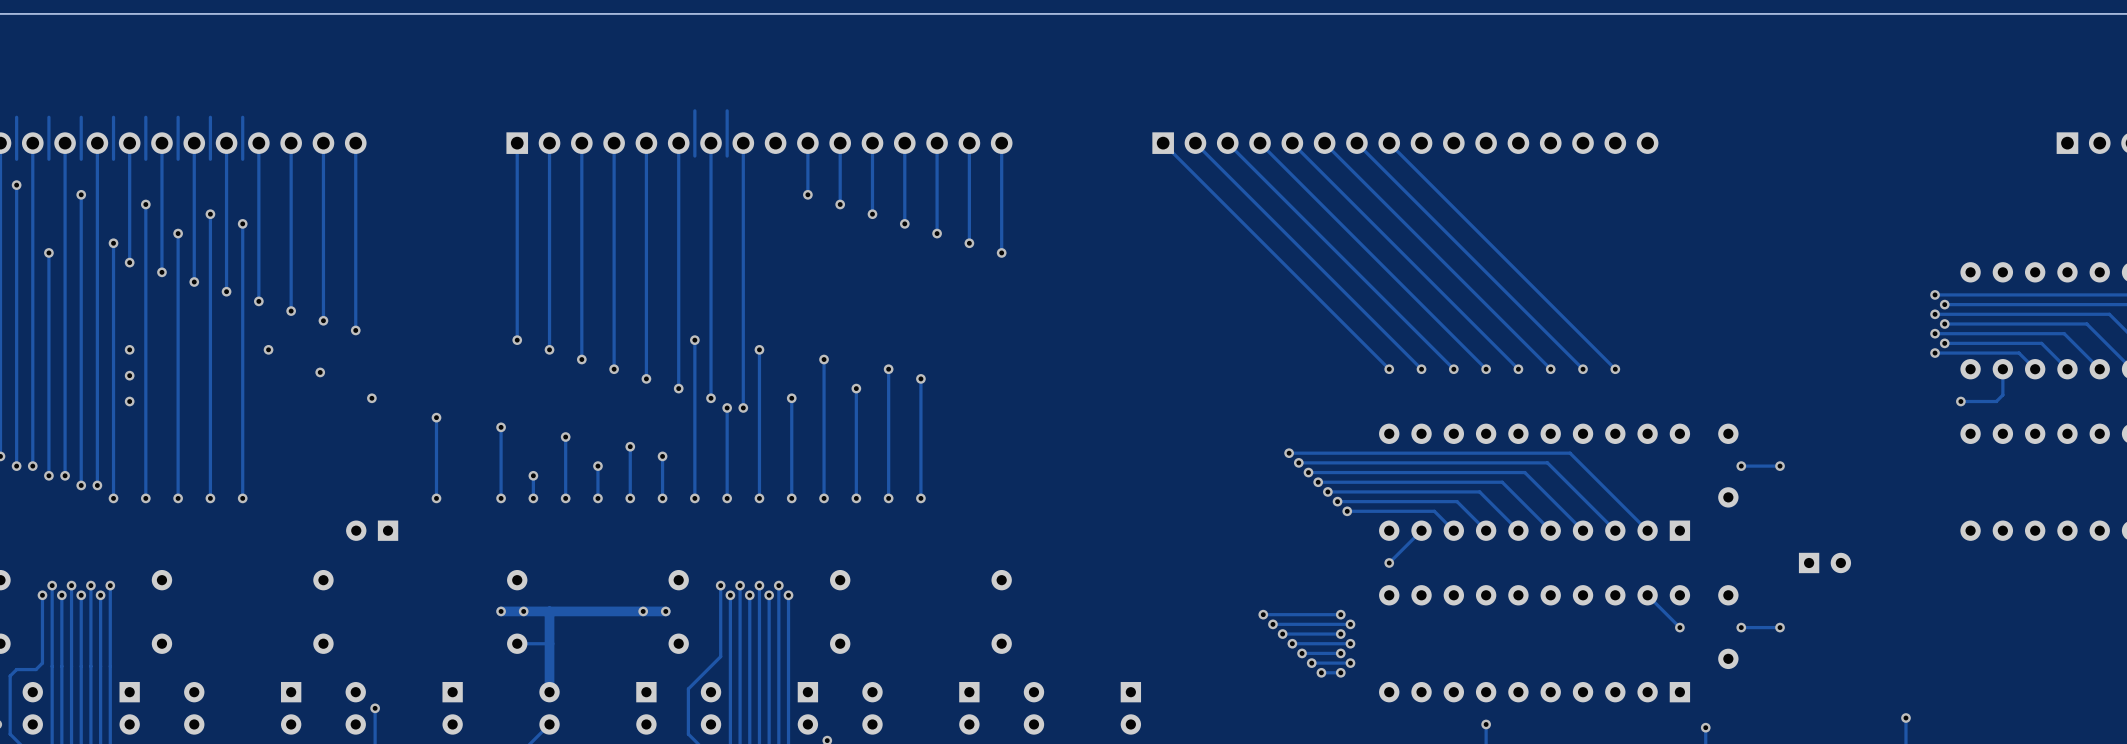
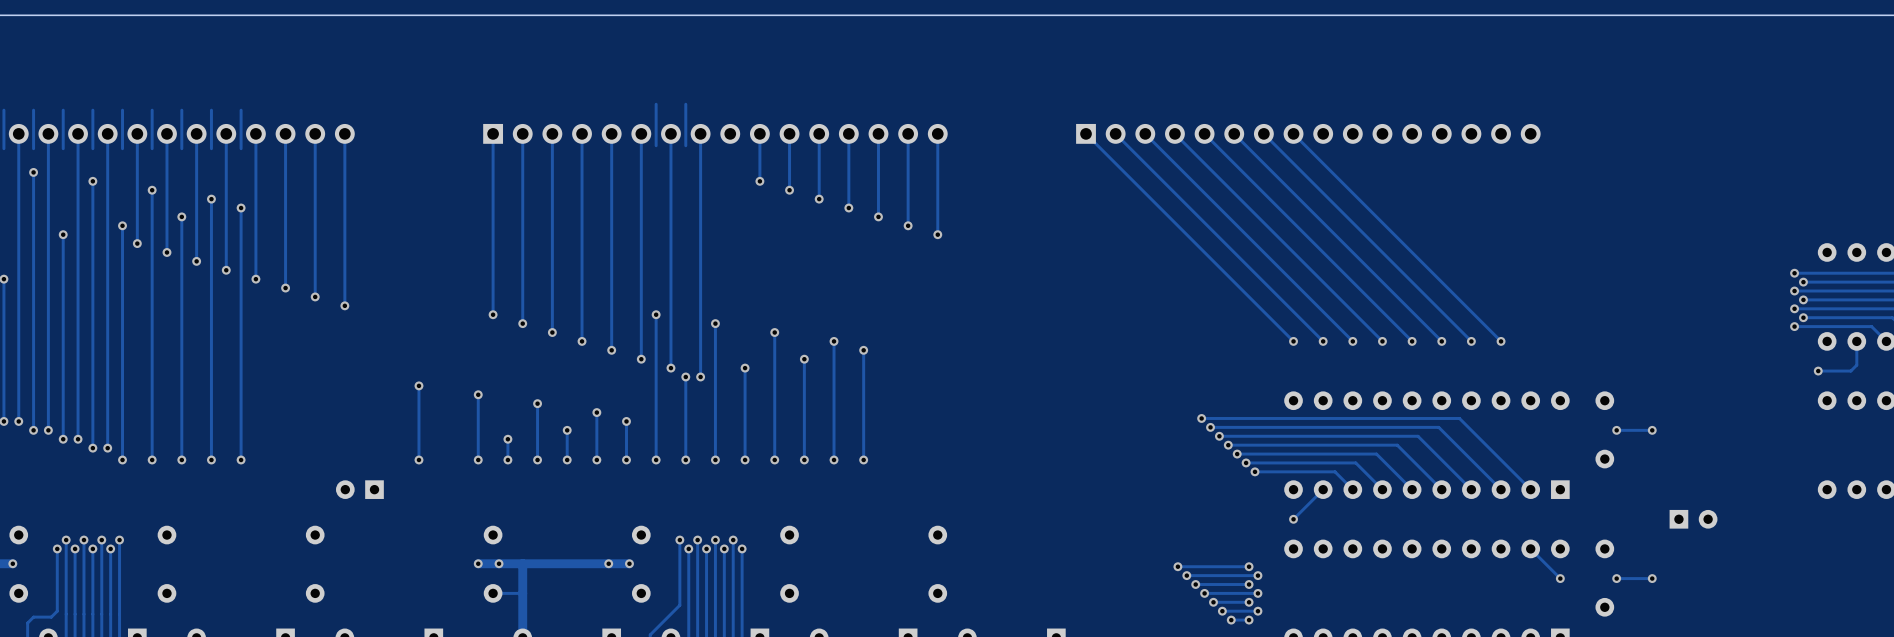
via: (129, 349) -> none
via: (268, 349) -> none
via: (320, 372) -> none
via: (129, 375) -> none
via: (371, 398) -> none
via: (129, 401) -> none

